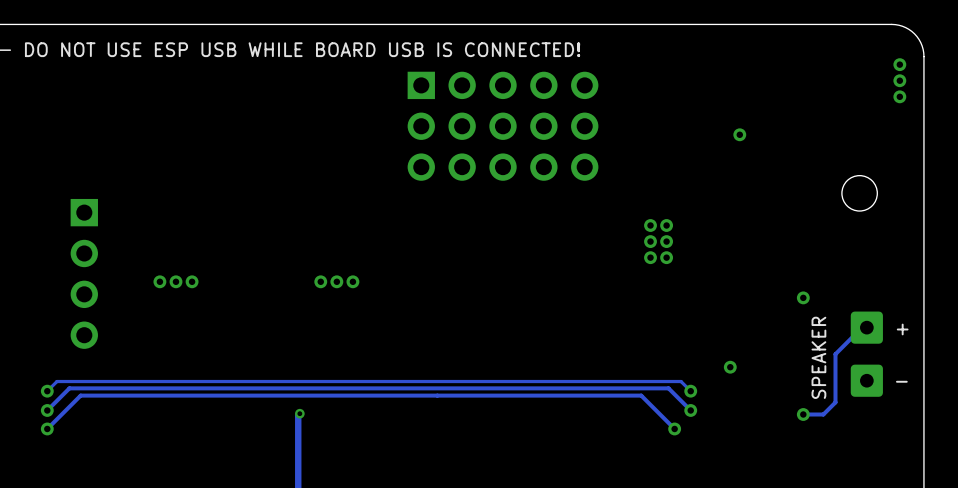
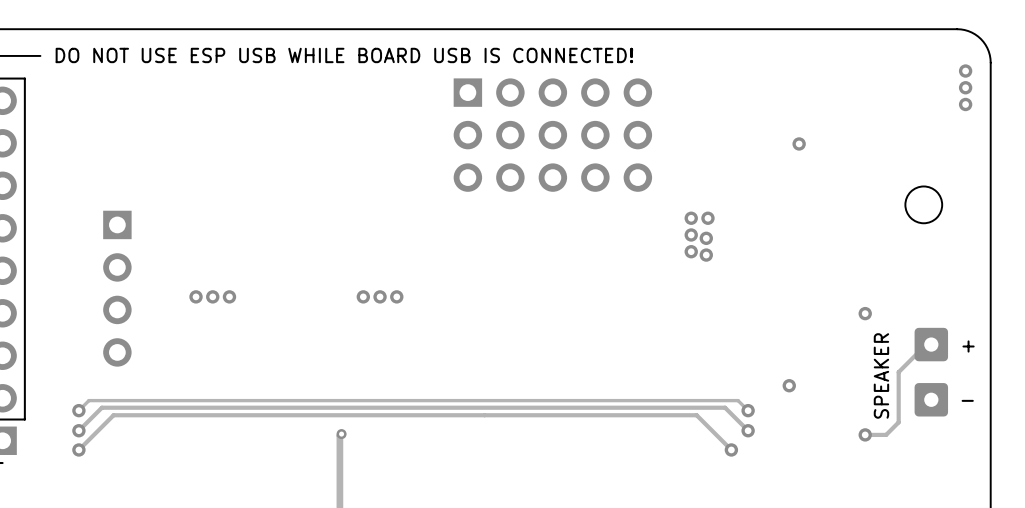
via: none -> (691, 218)
via: none -> (707, 218)
via: none -> (691, 234)
via: (666, 225) -> none
via: none -> (691, 251)
via: (666, 241) -> none
via: (650, 257) -> none
via: (666, 257) -> none

